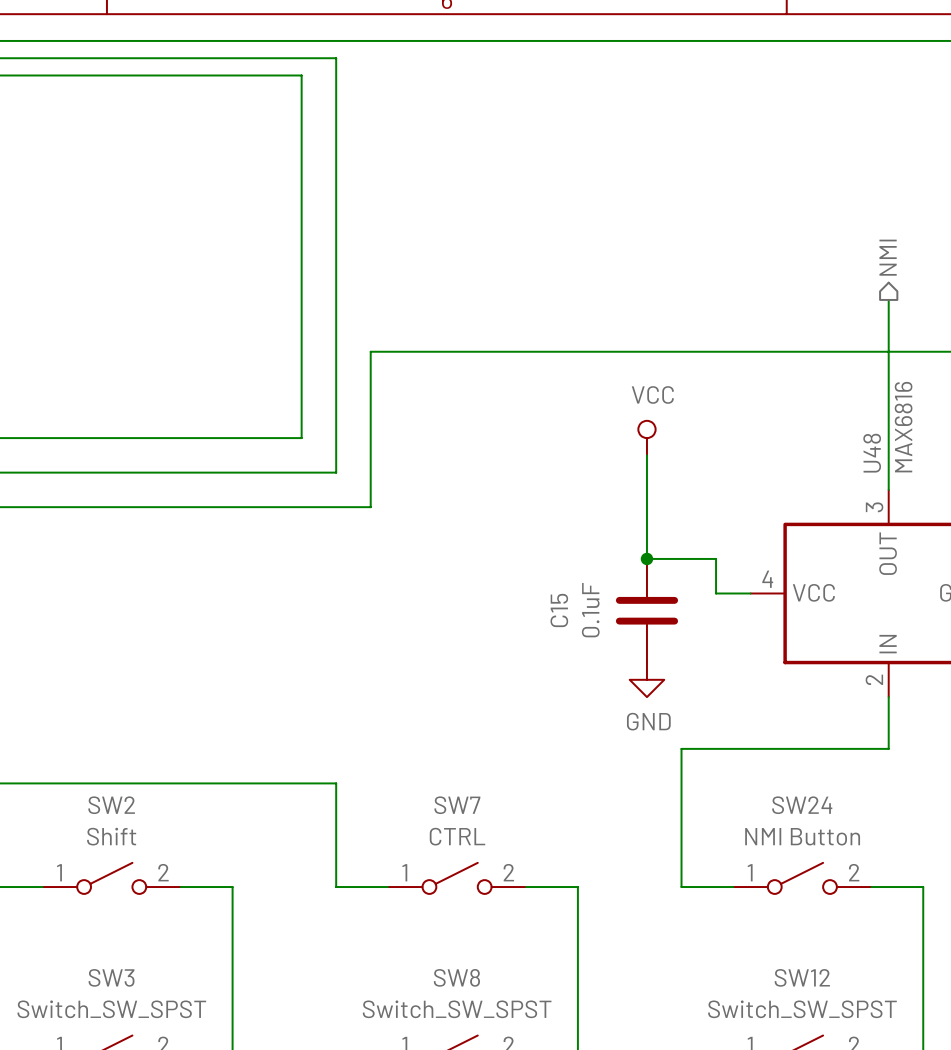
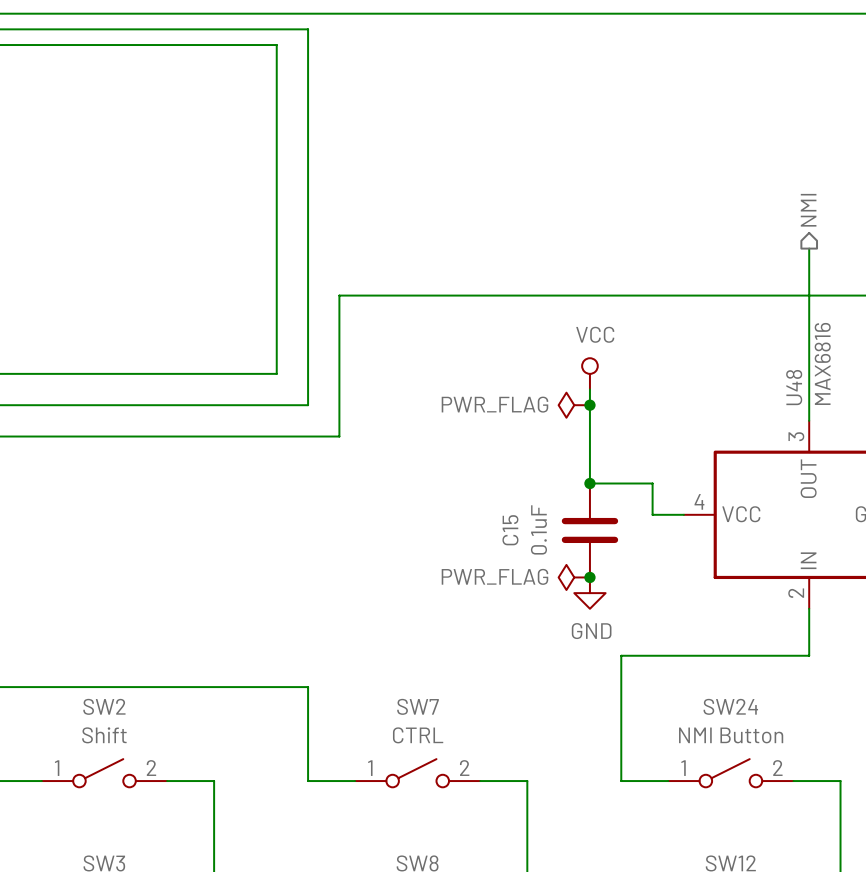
power symbol: none -> PWR_FLAG (574, 405)
junction: none -> (589, 405)
power symbol: none -> PWR_FLAG (574, 577)
junction: none -> (589, 577)

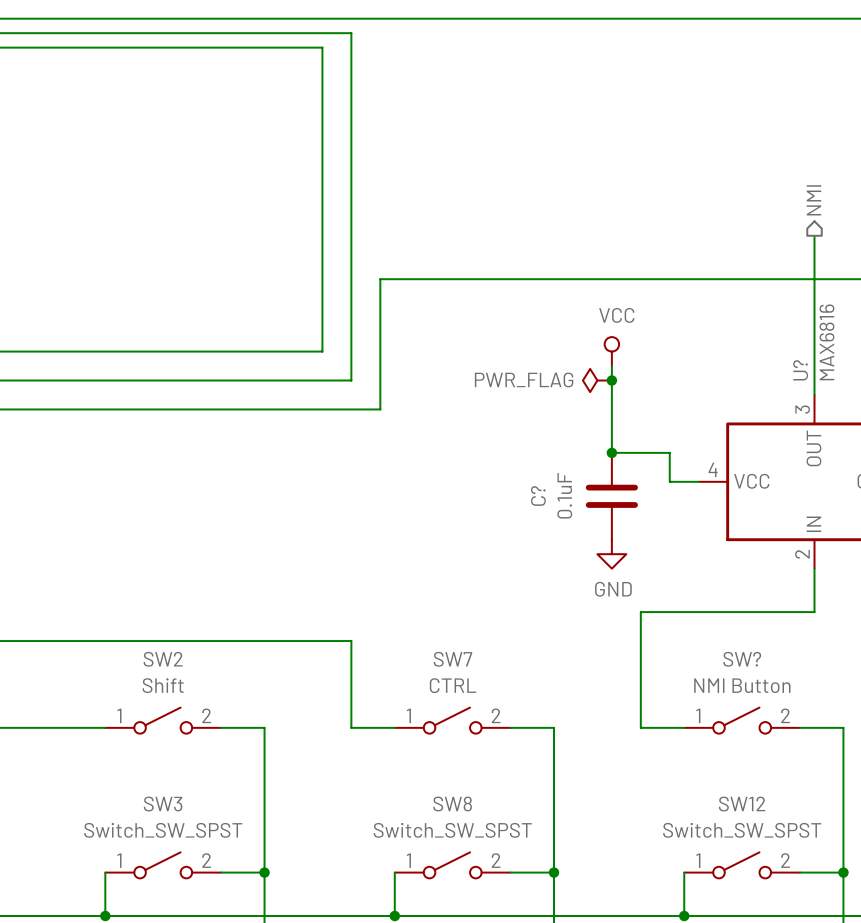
U48 name: U48 (794, 387) -> U? (800, 370)
C15 name: C15 (510, 530) -> C? (538, 495)
power symbol: PWR_FLAG (574, 577) -> none
junction: (589, 577) -> none
SW24 name: SW24 (730, 706) -> SW? (742, 659)

